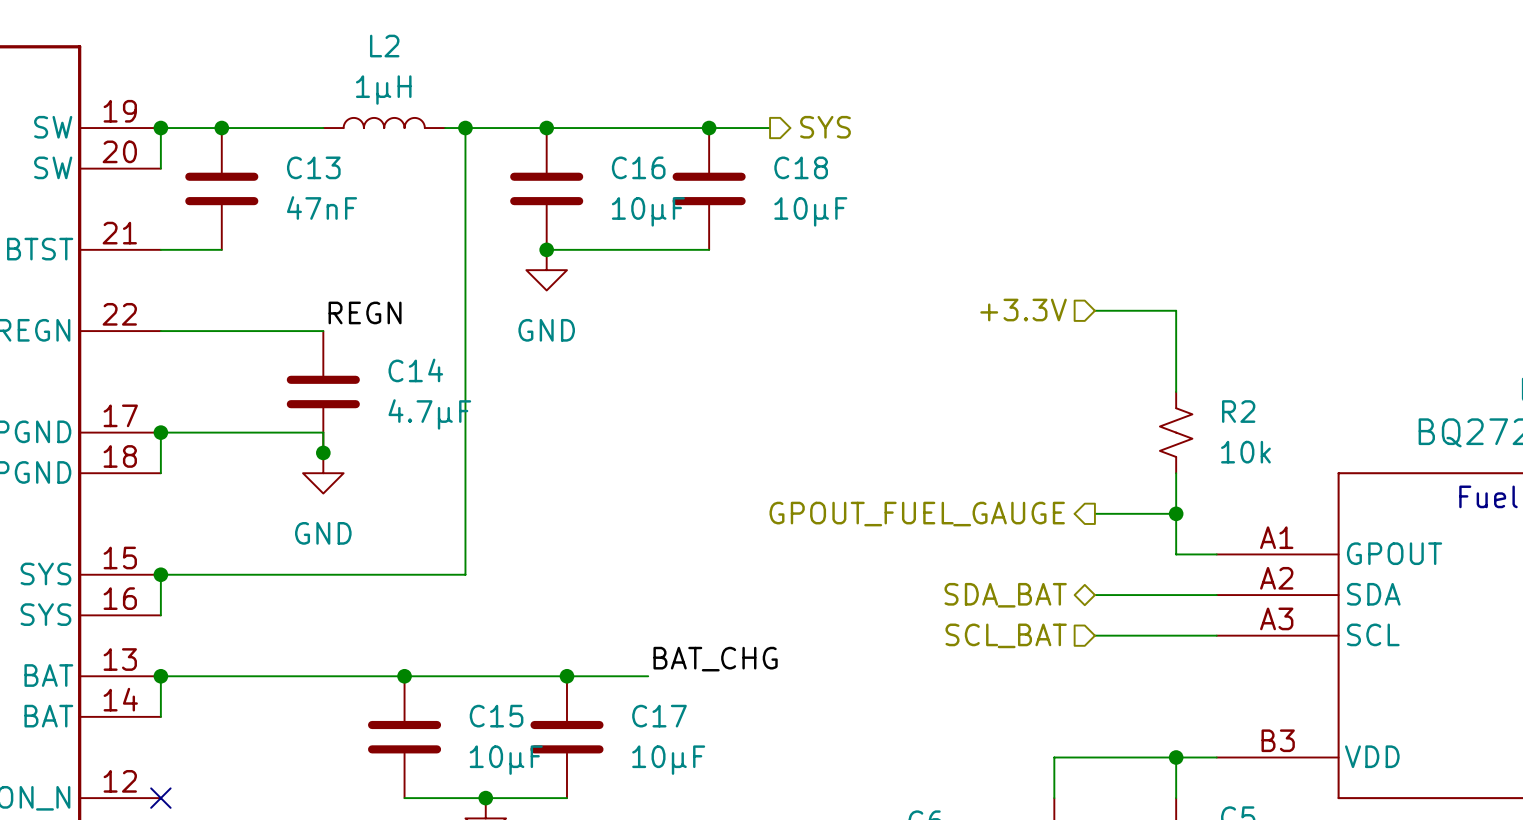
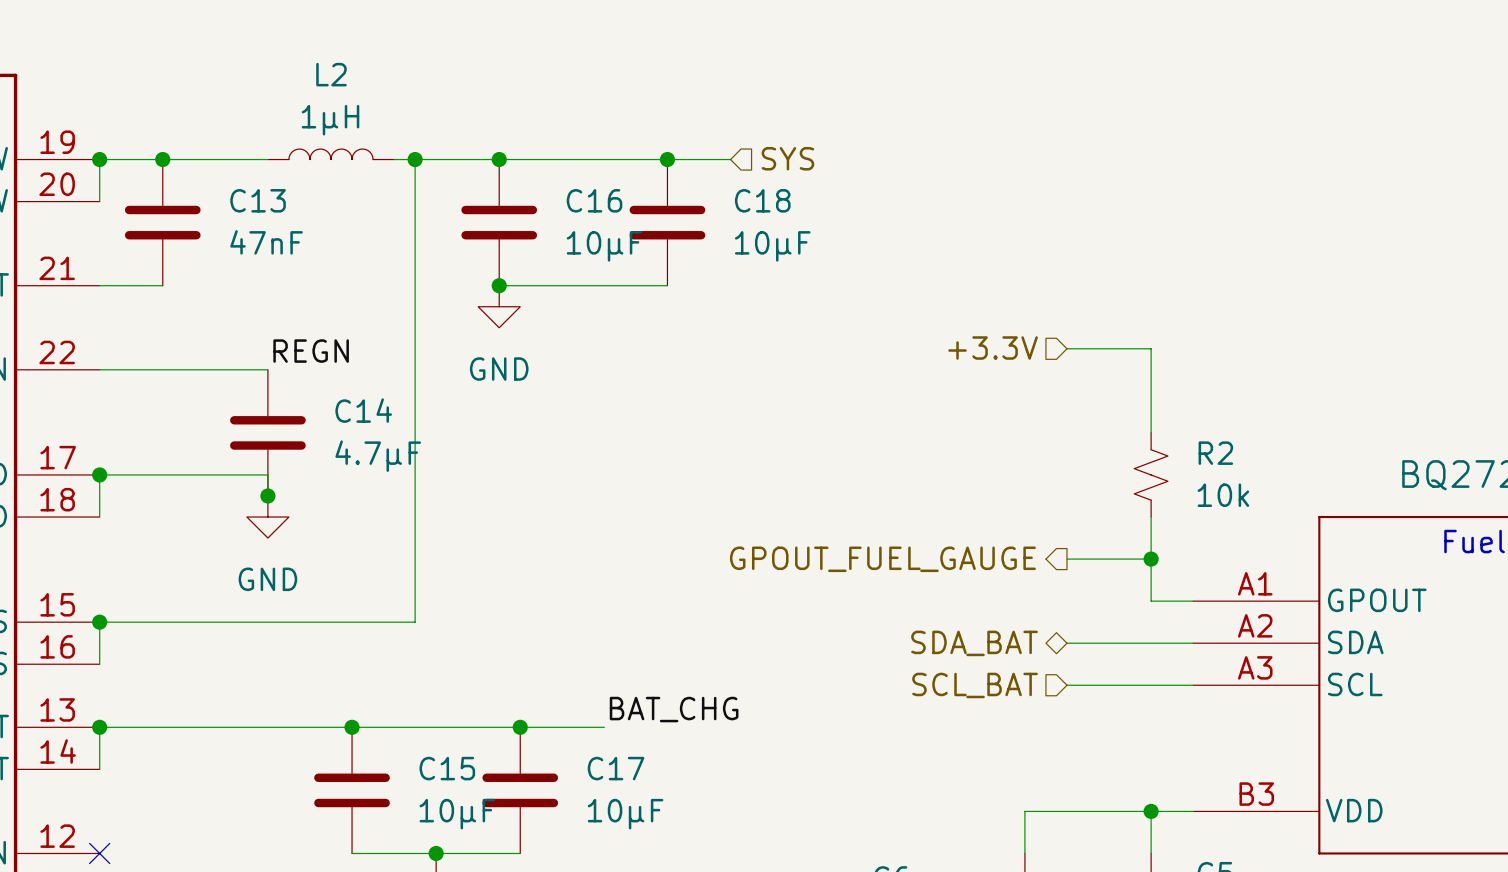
hierarchical label shape: output (825, 127) -> input (787, 158)

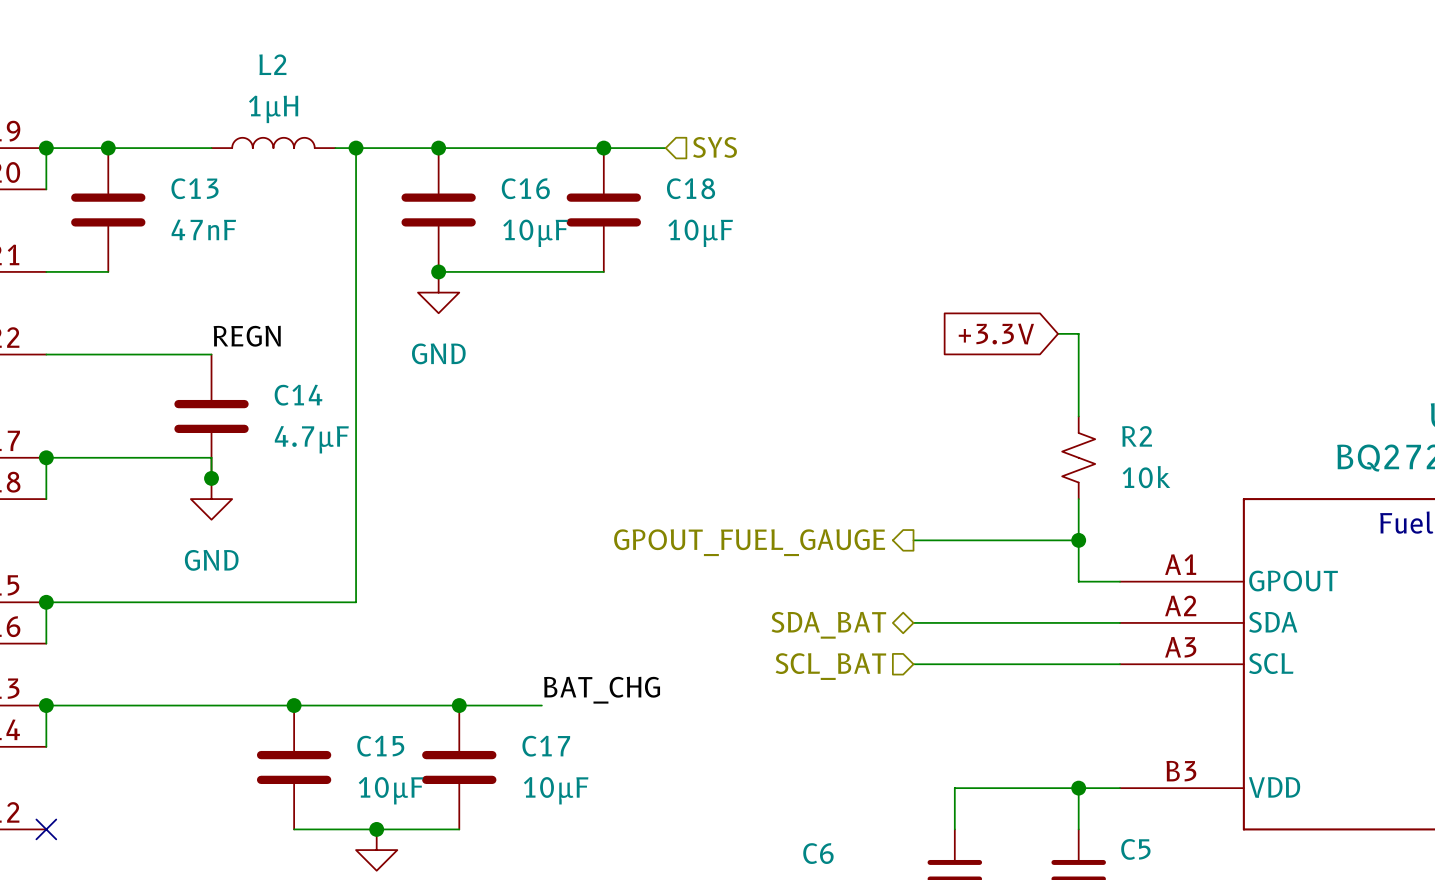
hierarchical label: +3.3V (993, 348) -> none
global label: none -> +3.3V (996, 334)
wire: (1066, 348) (1130, 348) -> none
hierarchical label position: GPOUT_FUEL_GAUGE (882, 559) -> GPOUT_FUEL_GAUGE (749, 542)
wire: none -> (913, 540) (996, 540)
hierarchical label position: SDA_BAT (974, 643) -> SDA_BAT (828, 625)
wire: none -> (913, 622) (996, 622)
hierarchical label position: SCL_BAT (975, 685) -> SCL_BAT (830, 666)
wire: none -> (913, 664) (996, 664)

